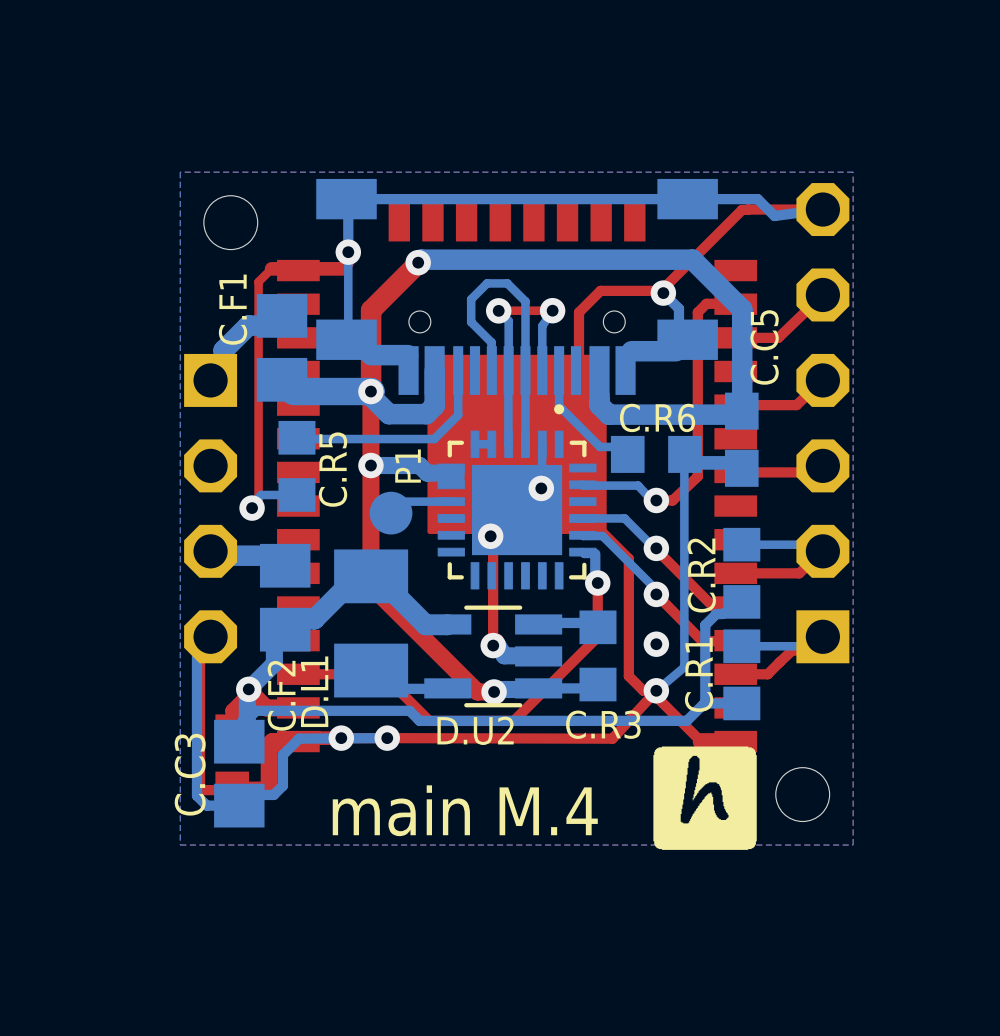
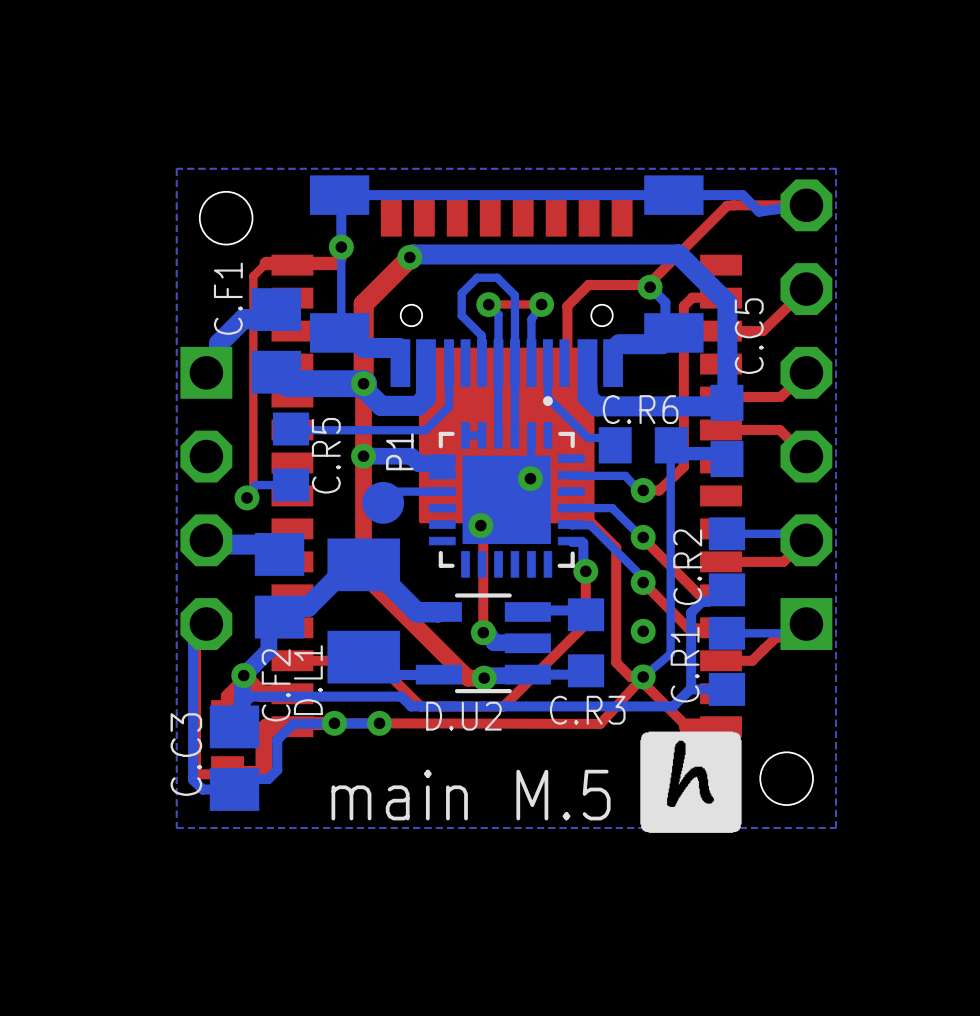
top track: (822, 465) (814, 472) (735, 472) -> (806, 456) (779, 430) (721, 430)
text: main M.4 (465, 810) -> main M.5 (471, 795)

